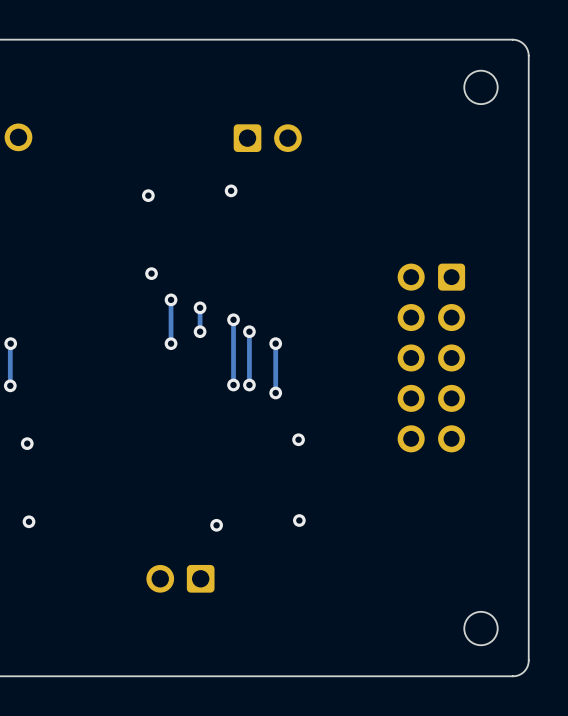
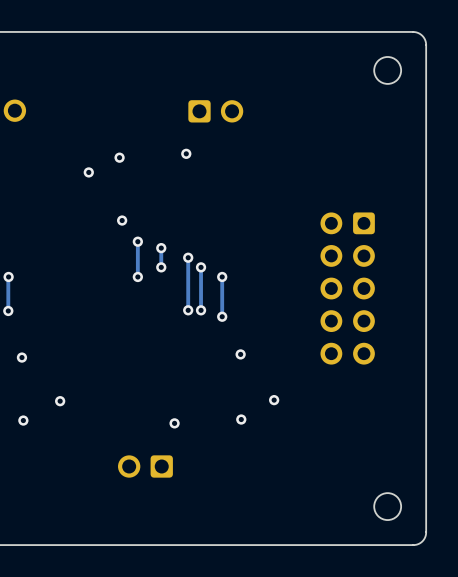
via: none -> (88, 172)
via: none -> (274, 400)
via: none -> (60, 401)

